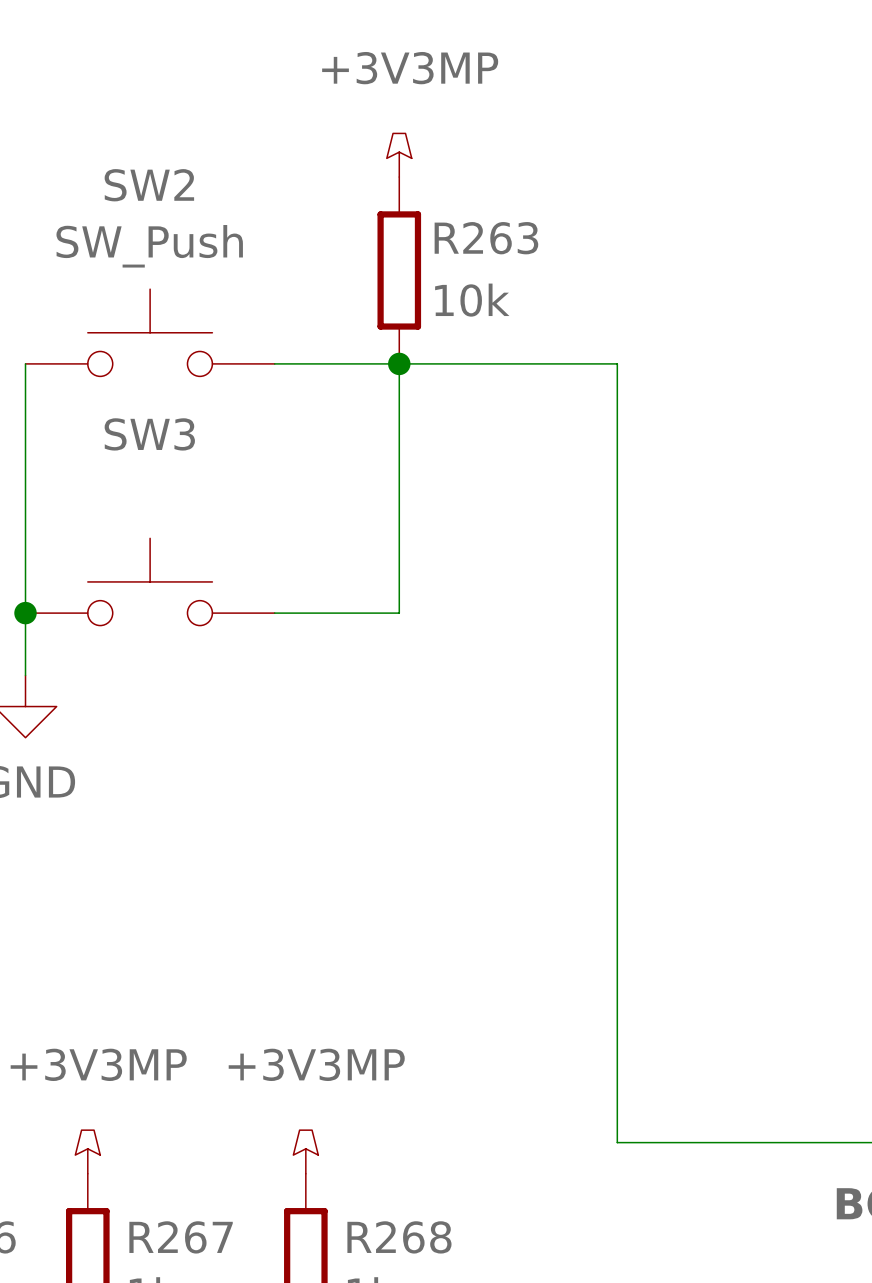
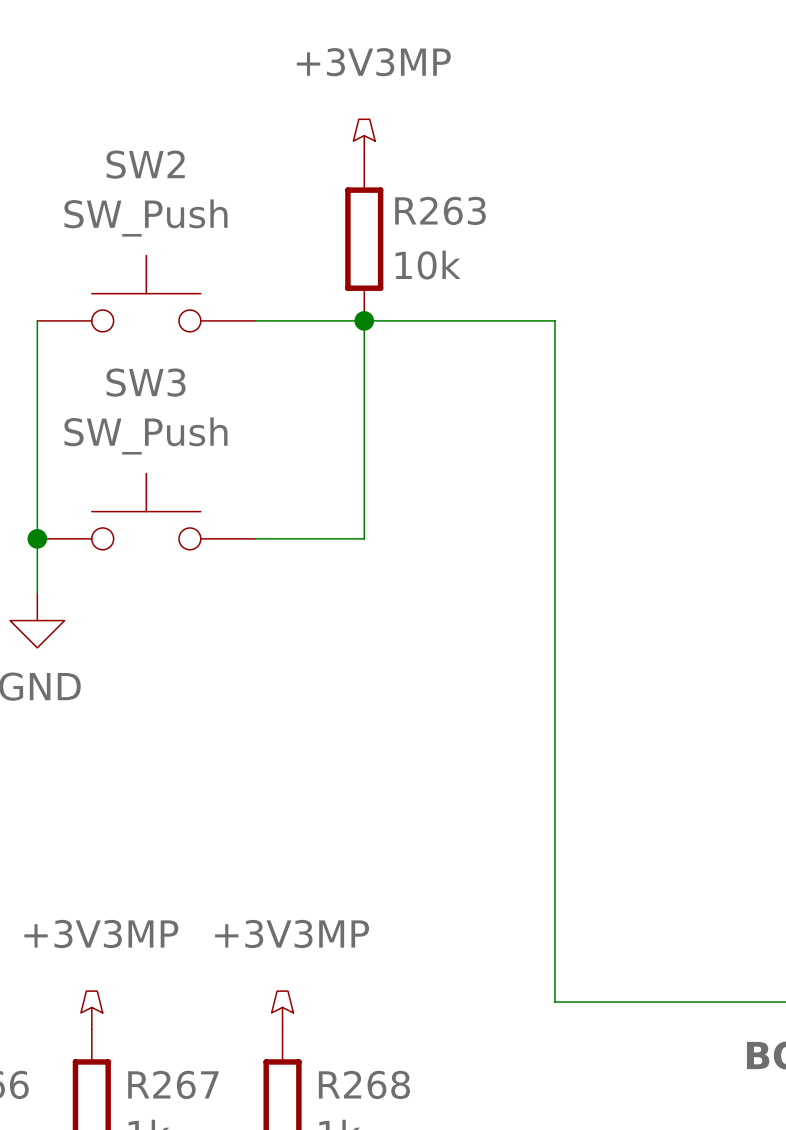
SW3 value: none -> SW_Push (145, 435)

